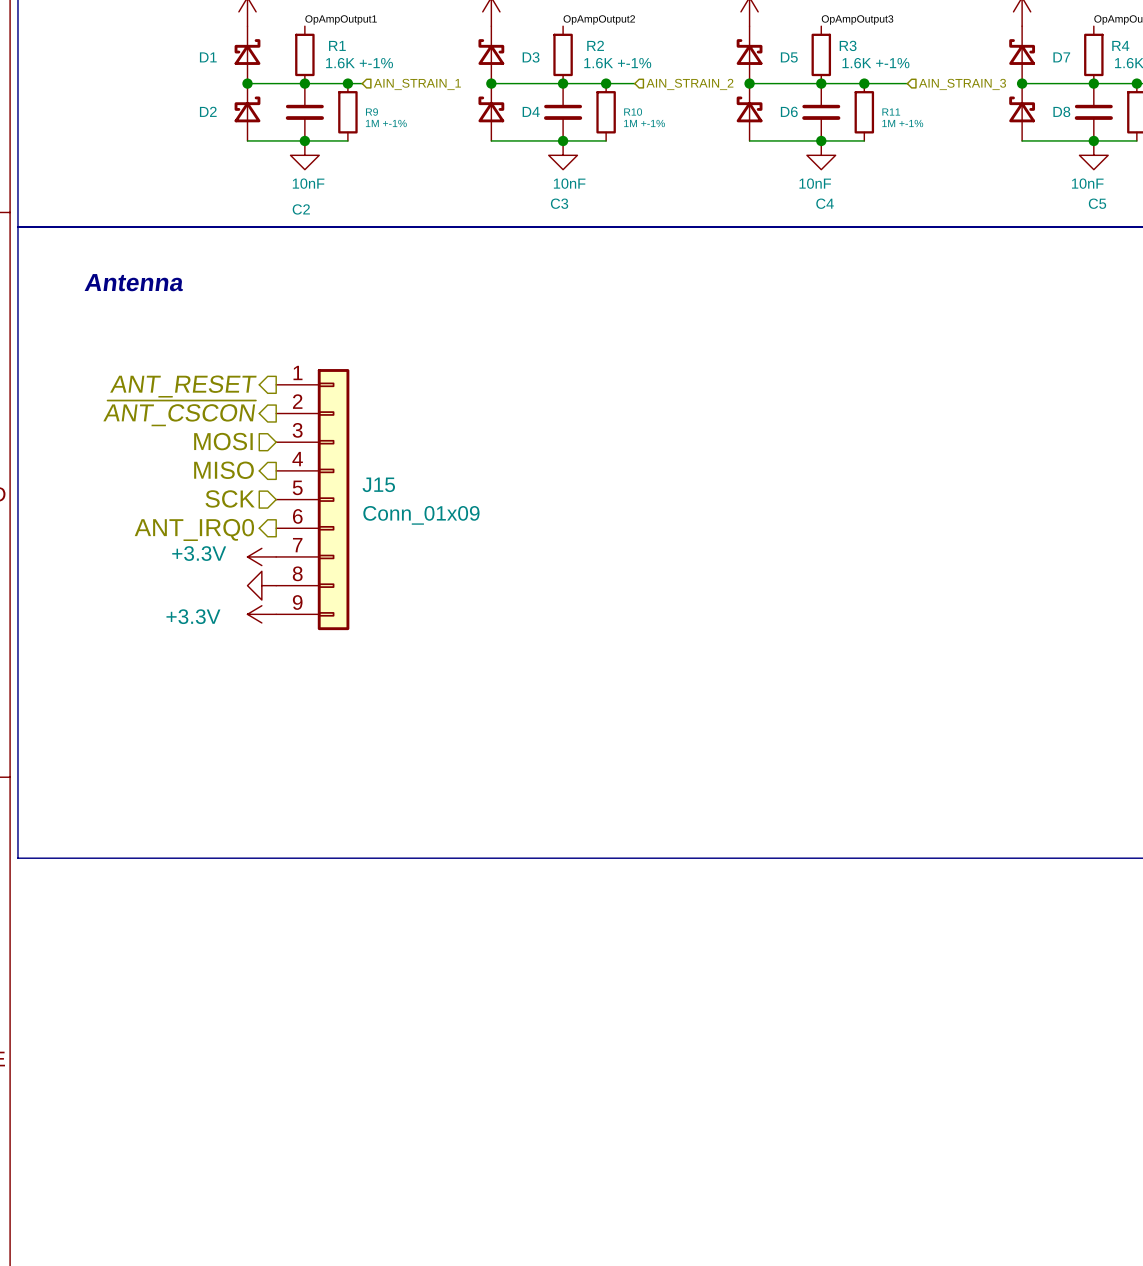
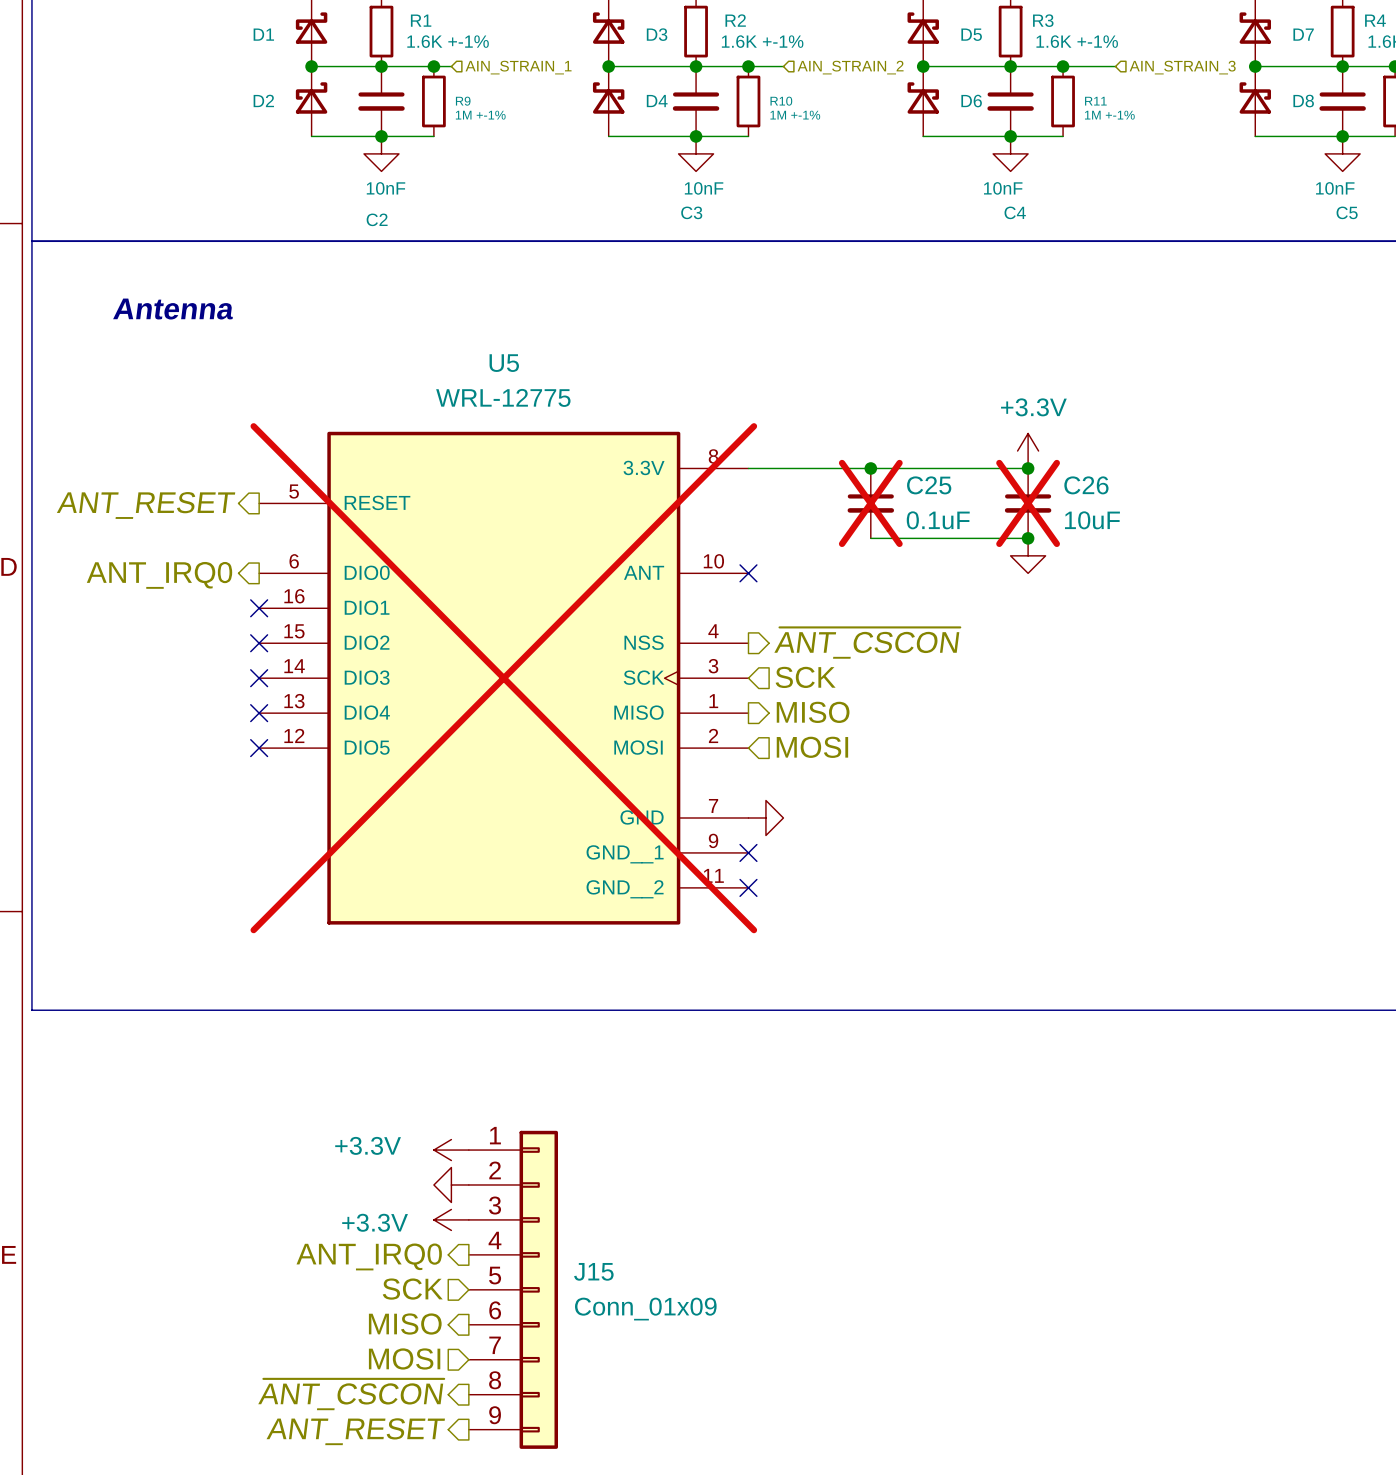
hierarchical label position: ANT_RESET (183, 386) -> ANT_RESET (146, 505)
power symbol: none -> +3.3V (1028, 451)
hierarchical label: ~{ANT_CSCON} (179, 413) -> none
wire: none -> (748, 468) (1028, 468)
junction: none -> (870, 468)
junction: none -> (1028, 468)
hierarchical label: MOSI (223, 441) -> none
C25: none -> 0.1uF (870, 503)
C26: none -> 10uF (1028, 503)
hierarchical label: MISO (223, 470) -> none
wire: none -> (870, 538) (1028, 538)
junction: none -> (1028, 538)
power symbol: none -> (1028, 555)
hierarchical label: SCK (230, 498) -> none
J15 position: (312, 499) -> (513, 1289)
no-connect mark: none -> (748, 573)
no-connect mark: none -> (259, 608)
hierarchical label position: ANT_IRQ0 (194, 529) -> ANT_IRQ0 (159, 575)
no-connect mark: none -> (259, 643)
power symbol: +3.3V (261, 556) -> none
hierarchical label: none -> ~{ANT_CSCON} (867, 643)
no-connect mark: none -> (259, 678)
power symbol: (261, 585) -> none
U5: none -> WRL-12775 (503, 678)
hierarchical label: none -> SCK (805, 677)
hierarchical label: none -> MISO (813, 712)
no-connect mark: none -> (259, 713)
power symbol: +3.3V (261, 614) -> none
hierarchical label: none -> MOSI (812, 747)
no-connect mark: none -> (259, 748)
power symbol: none -> (765, 818)
no-connect mark: none -> (748, 852)
no-connect mark: none -> (748, 887)
power symbol: none -> +3.3V (451, 1150)
power symbol: none -> (451, 1184)
power symbol: none -> +3.3V (451, 1219)
hierarchical label: none -> ANT_IRQ0 (369, 1256)
hierarchical label: none -> SCK (412, 1289)
hierarchical label: none -> MISO (405, 1324)
hierarchical label: none -> MOSI (404, 1358)
hierarchical label: none -> ~{ANT_CSCON} (351, 1394)
hierarchical label: none -> ANT_RESET (355, 1431)

